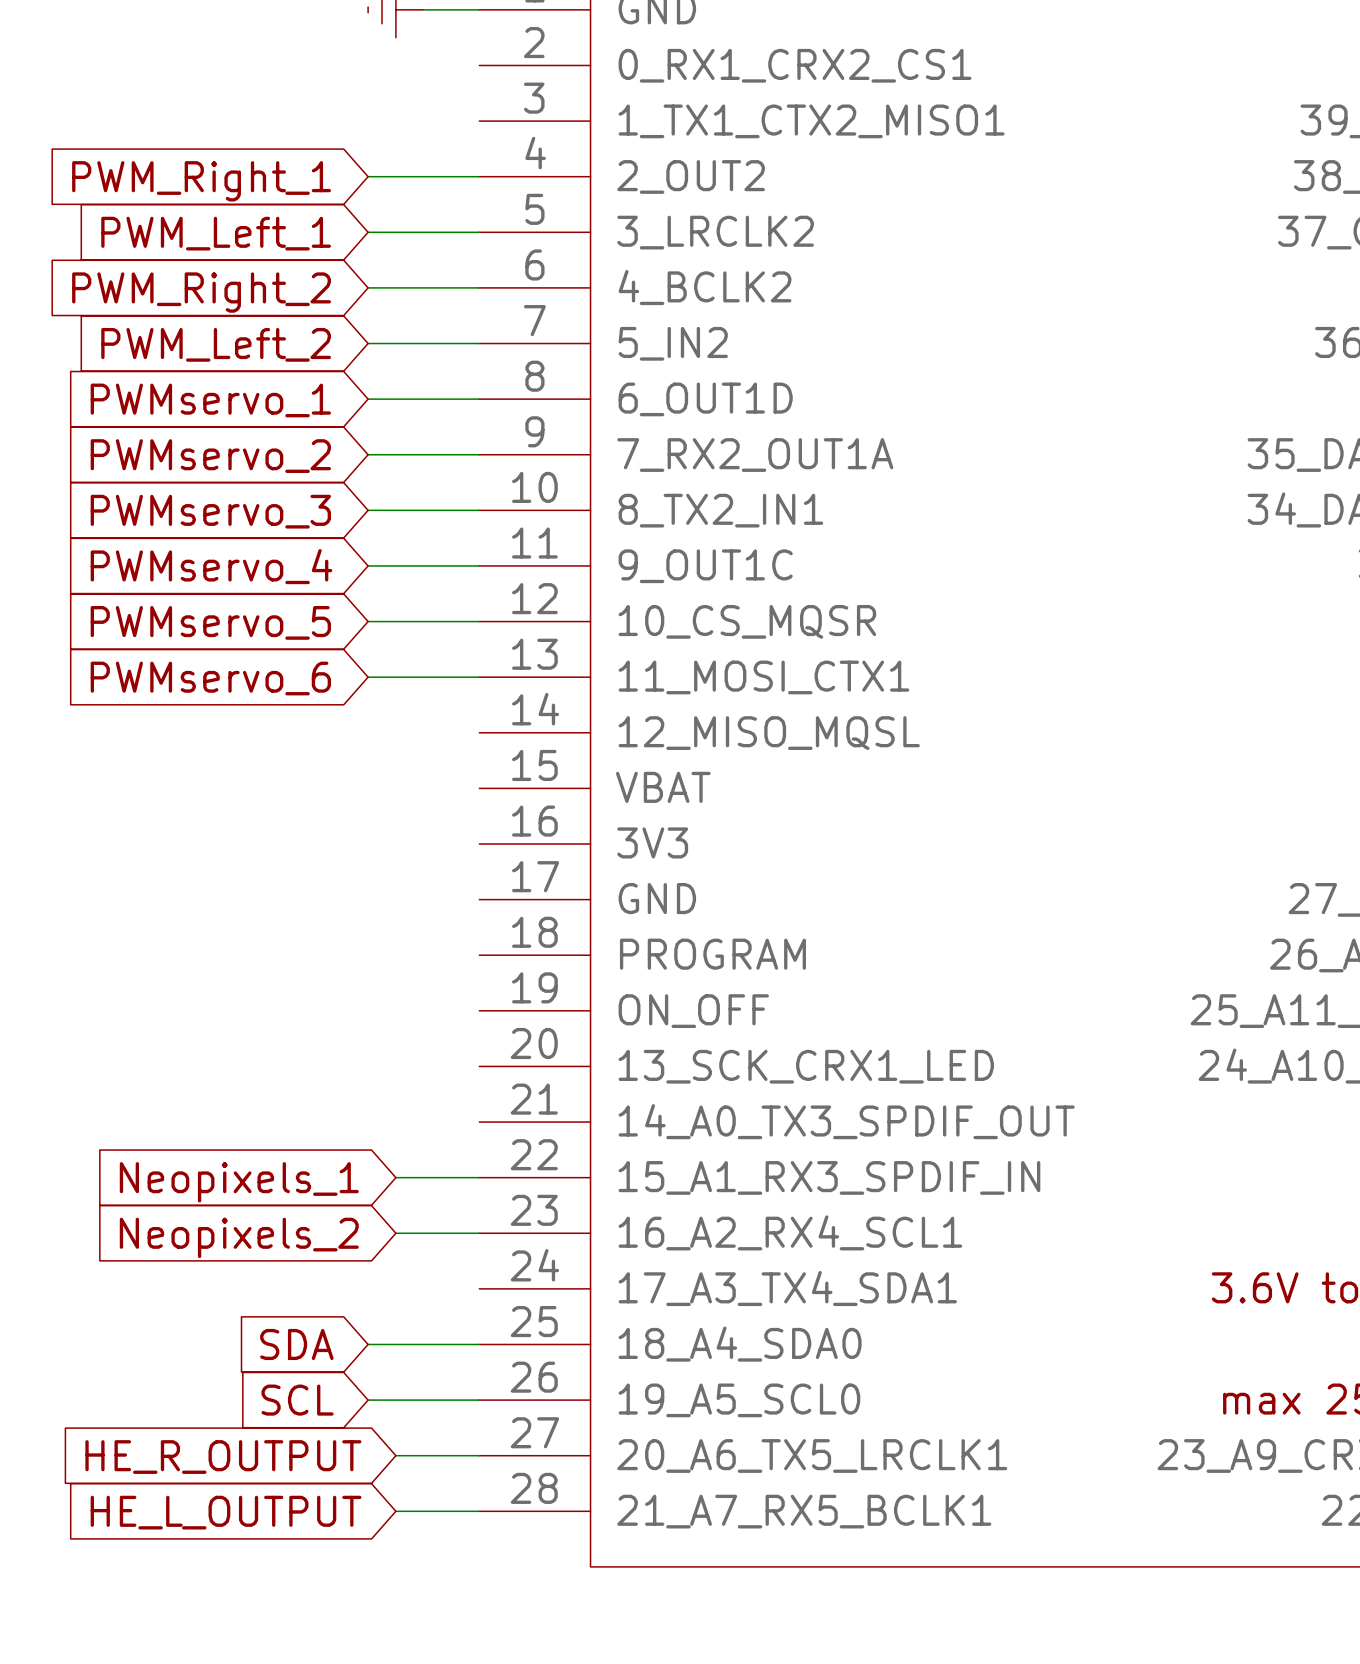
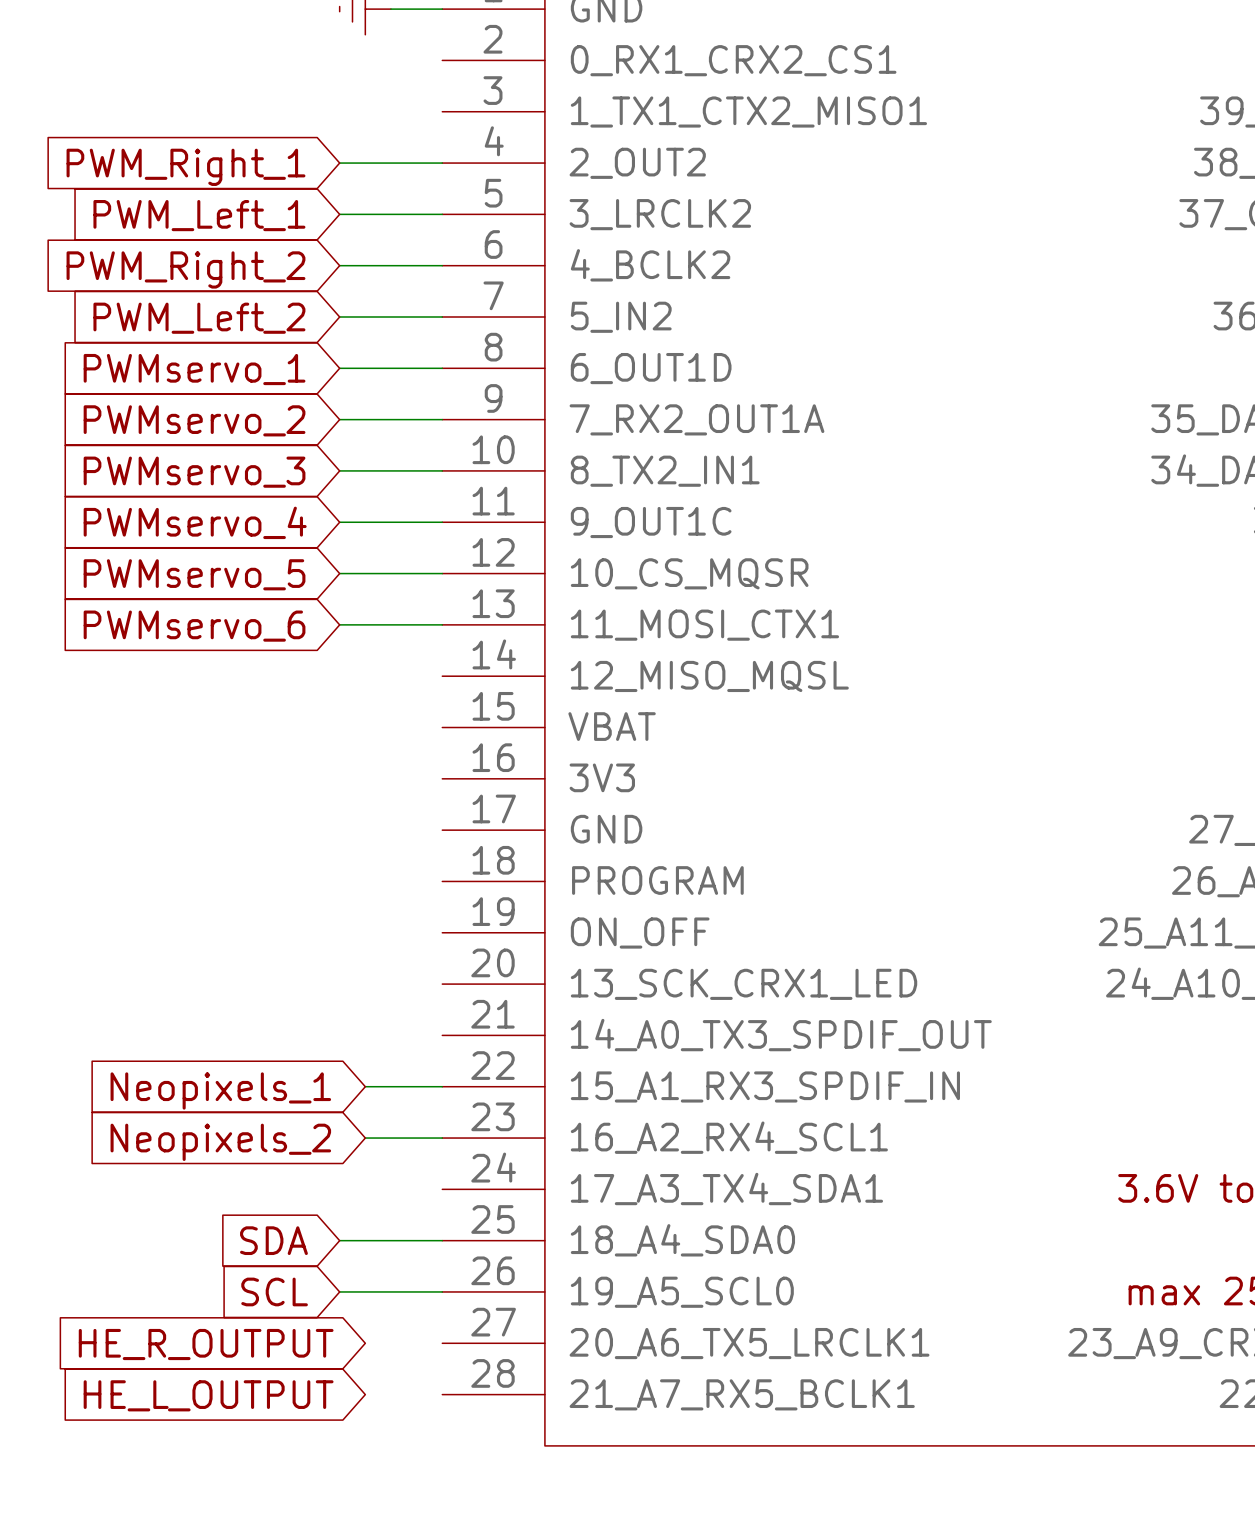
wire: (395, 1455) (479, 1455) -> none
wire: (395, 1511) (479, 1511) -> none

